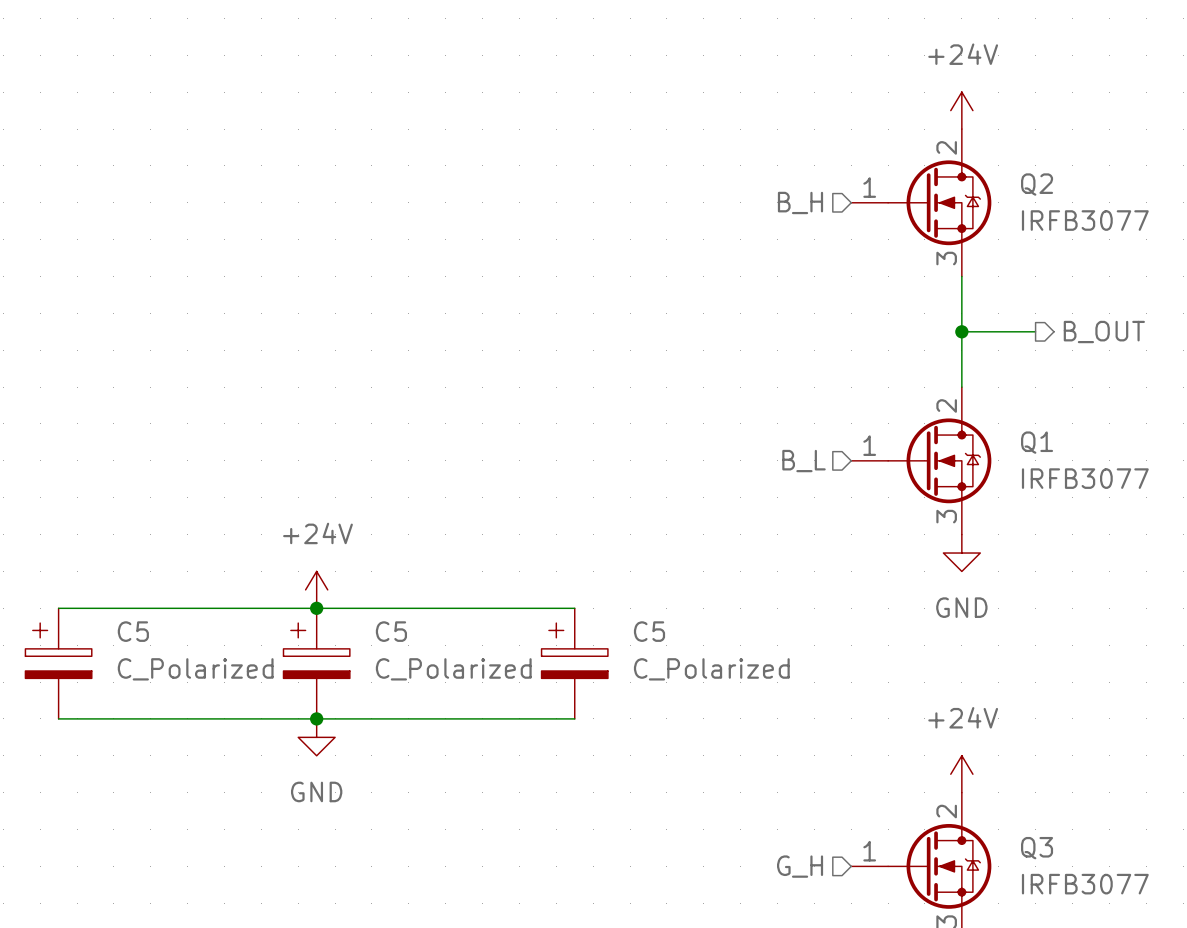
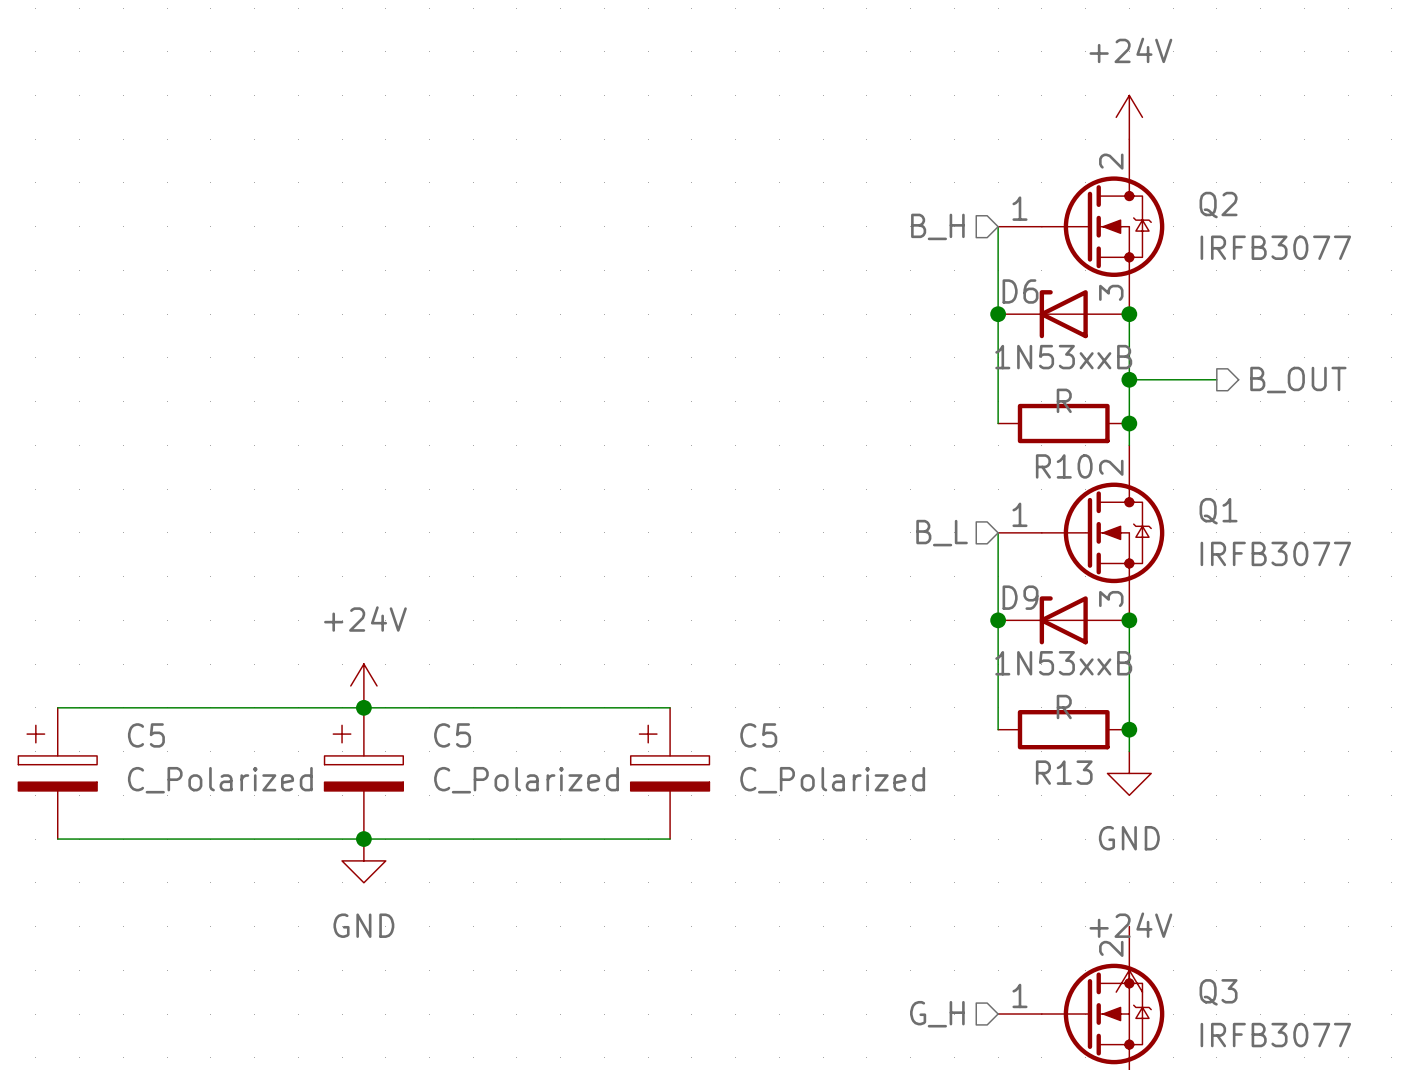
wire: none -> (998, 226) (998, 423)
junction: none -> (998, 314)
D6: none -> 1N53xxB (1063, 314)
junction: none -> (1129, 314)
R10: none -> R (1063, 423)
junction: none -> (1129, 423)
wire: none -> (998, 532) (998, 729)
junction: none -> (998, 620)
D9: none -> 1N53xxB (1063, 620)
wire: none -> (1129, 620) (1129, 751)
junction: none -> (1129, 620)
power symbol position: GND (961, 553) -> GND (1129, 773)
R13: none -> R (1063, 729)
junction: none -> (1129, 729)
power symbol position: +24V (961, 774) -> +24V (1129, 992)

